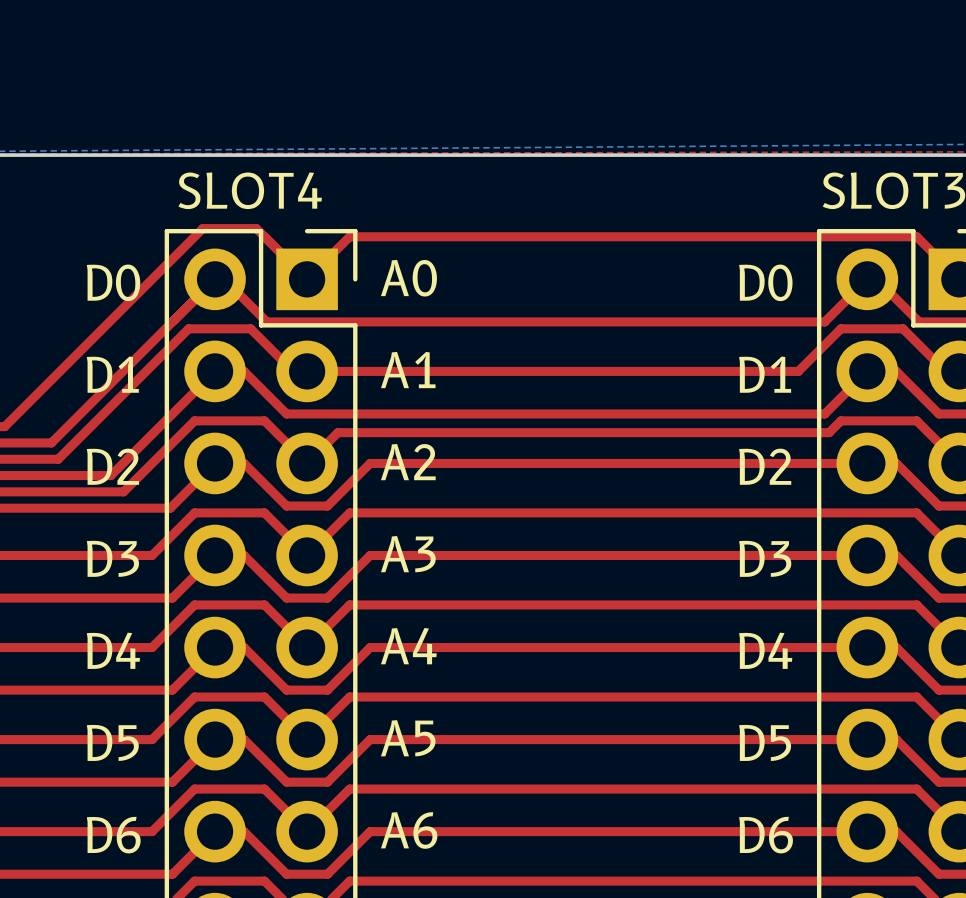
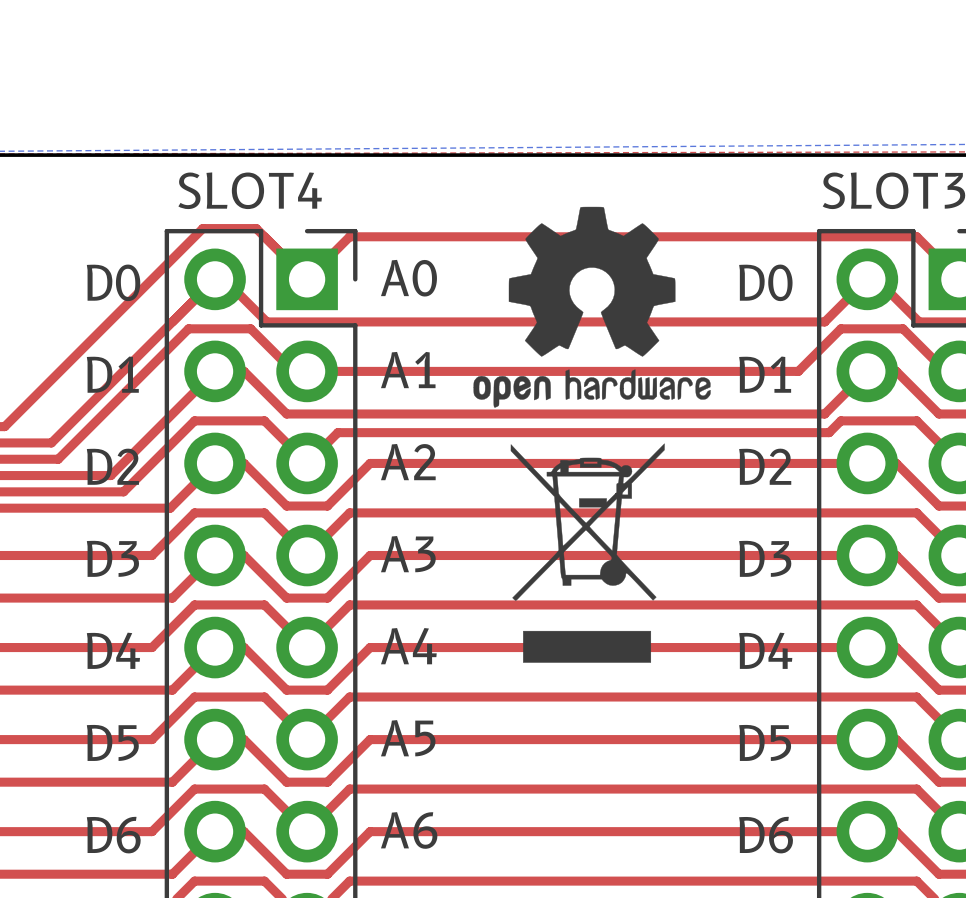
drawing: none -> [473, 206, 711, 663]

